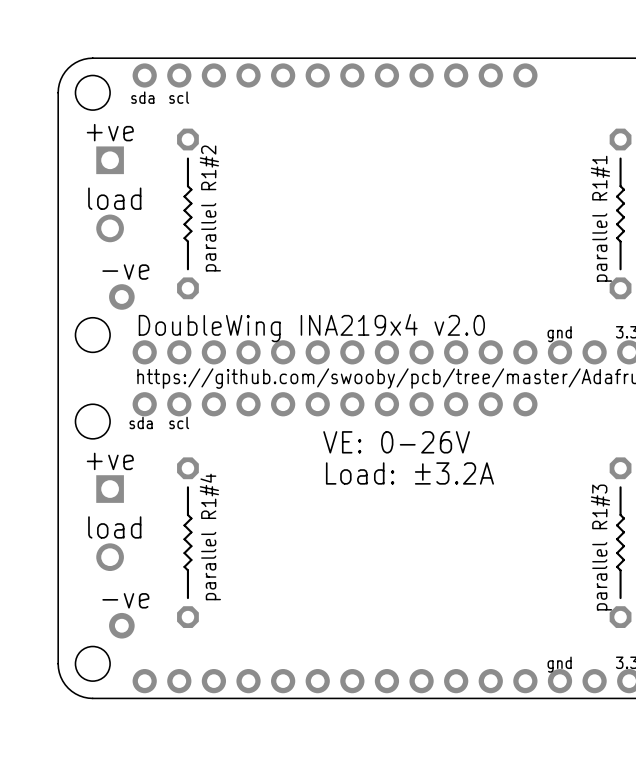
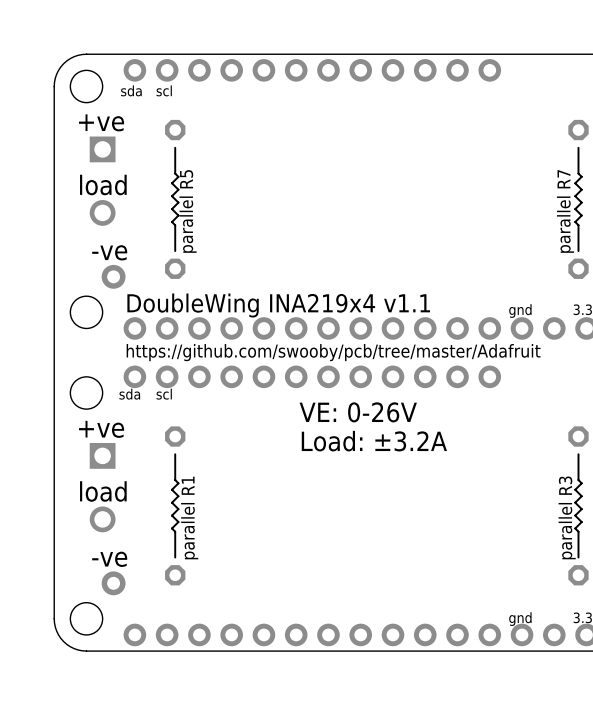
text: parallel R1#2 (210, 208) -> parallel R5 (188, 211)
text: parallel R1#1 (601, 218) -> parallel R7 (565, 211)
text: DoubleWing INA219x4 v2.0 (311, 328) -> DoubleWing INA219x4 v1.1 (278, 305)
text: parallel R1#4 (210, 536) -> parallel R1 (189, 517)
text: parallel R1#3 (601, 547) -> parallel R3 (567, 517)

